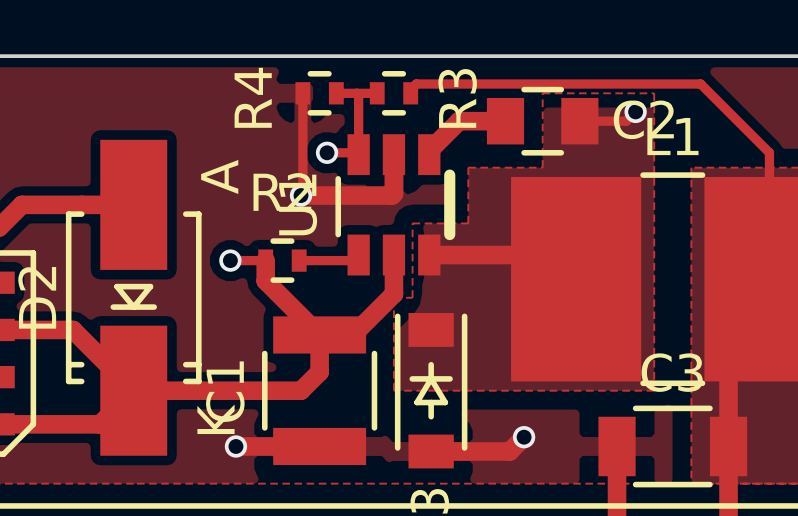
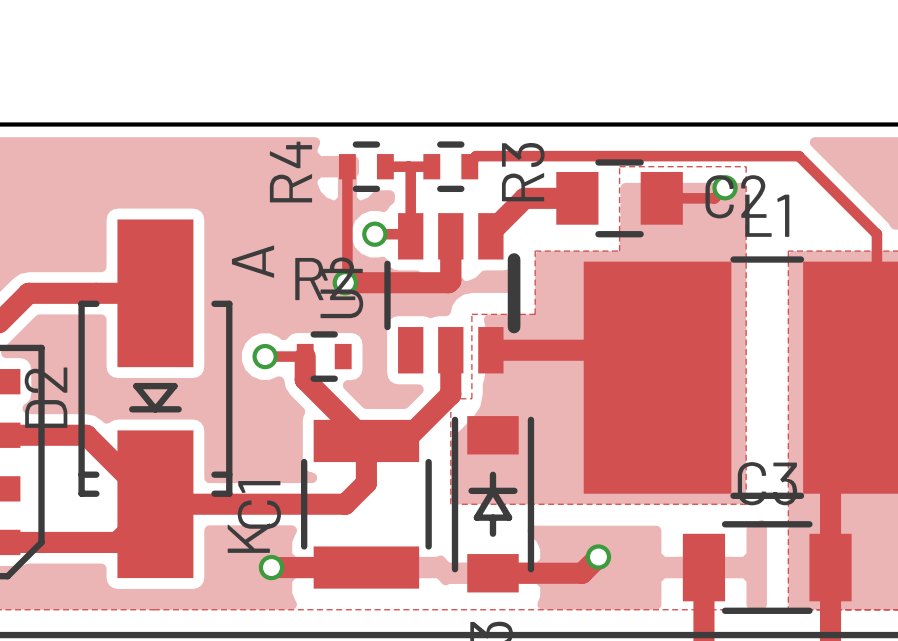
track: (358, 255) (353, 260) (299, 260) -> none

